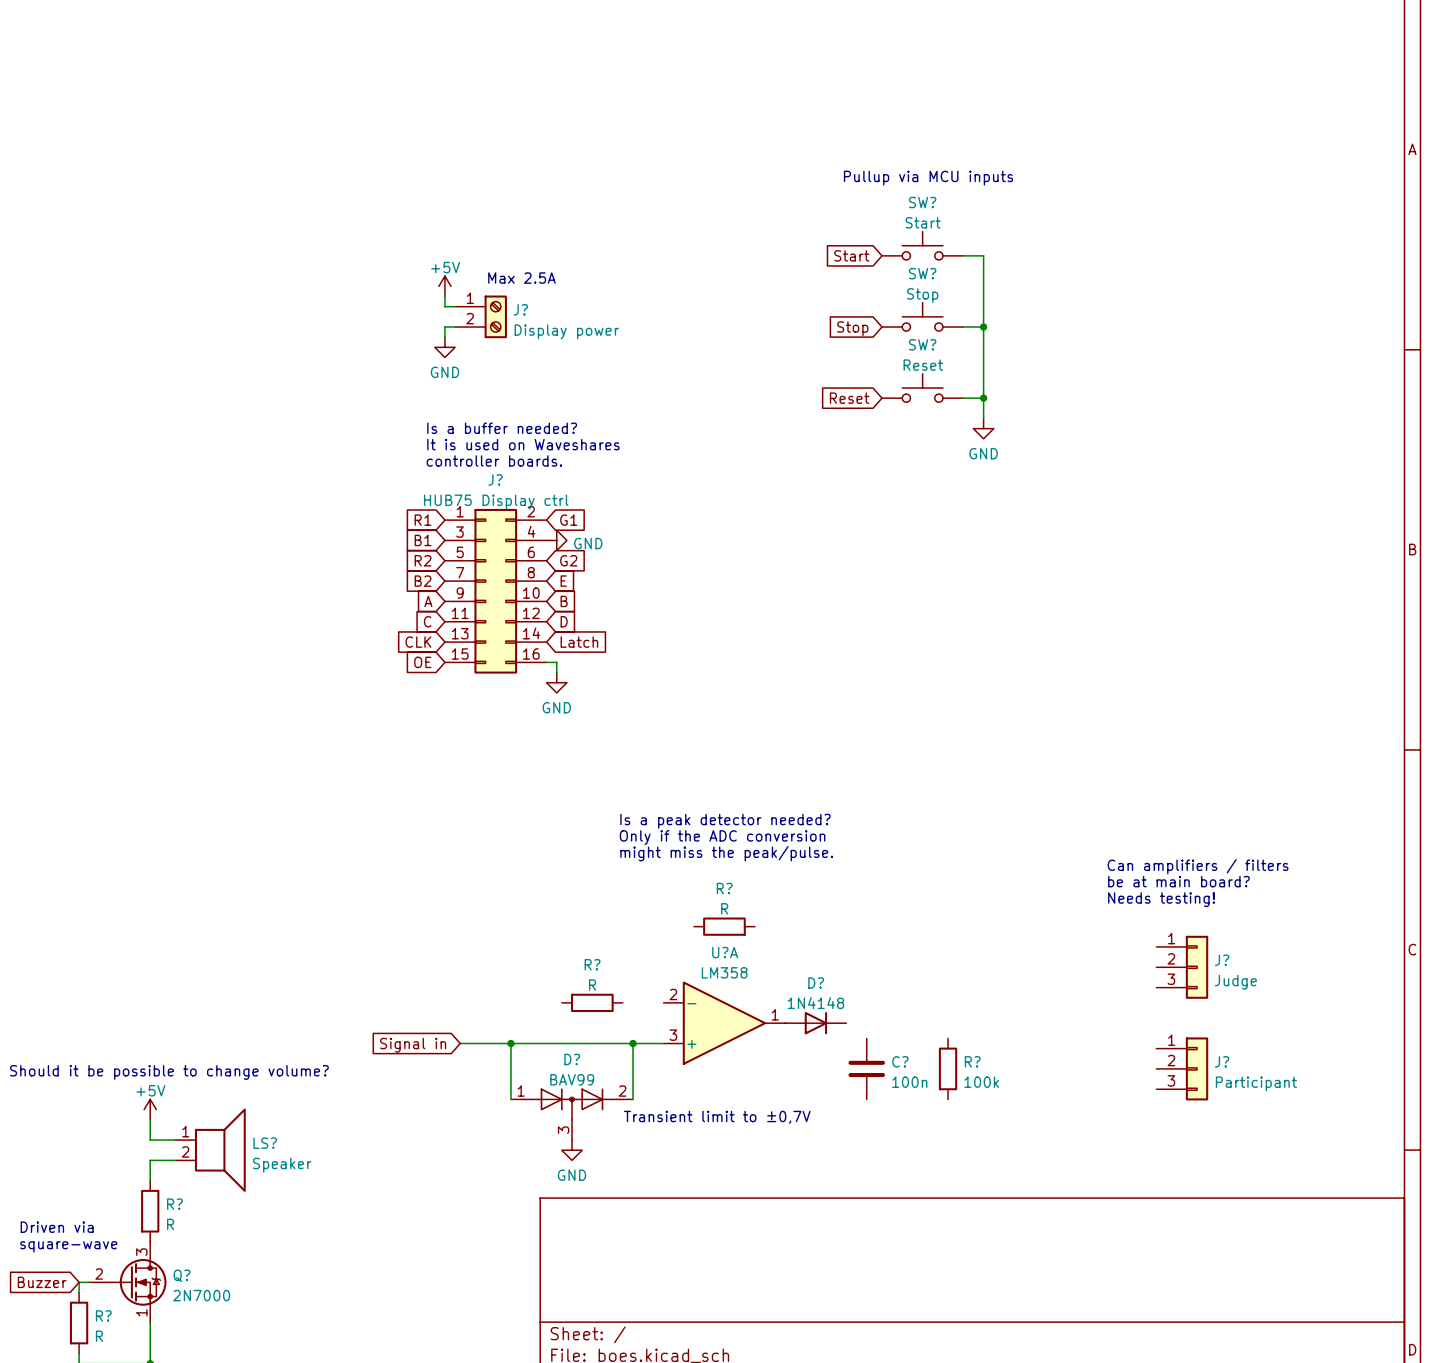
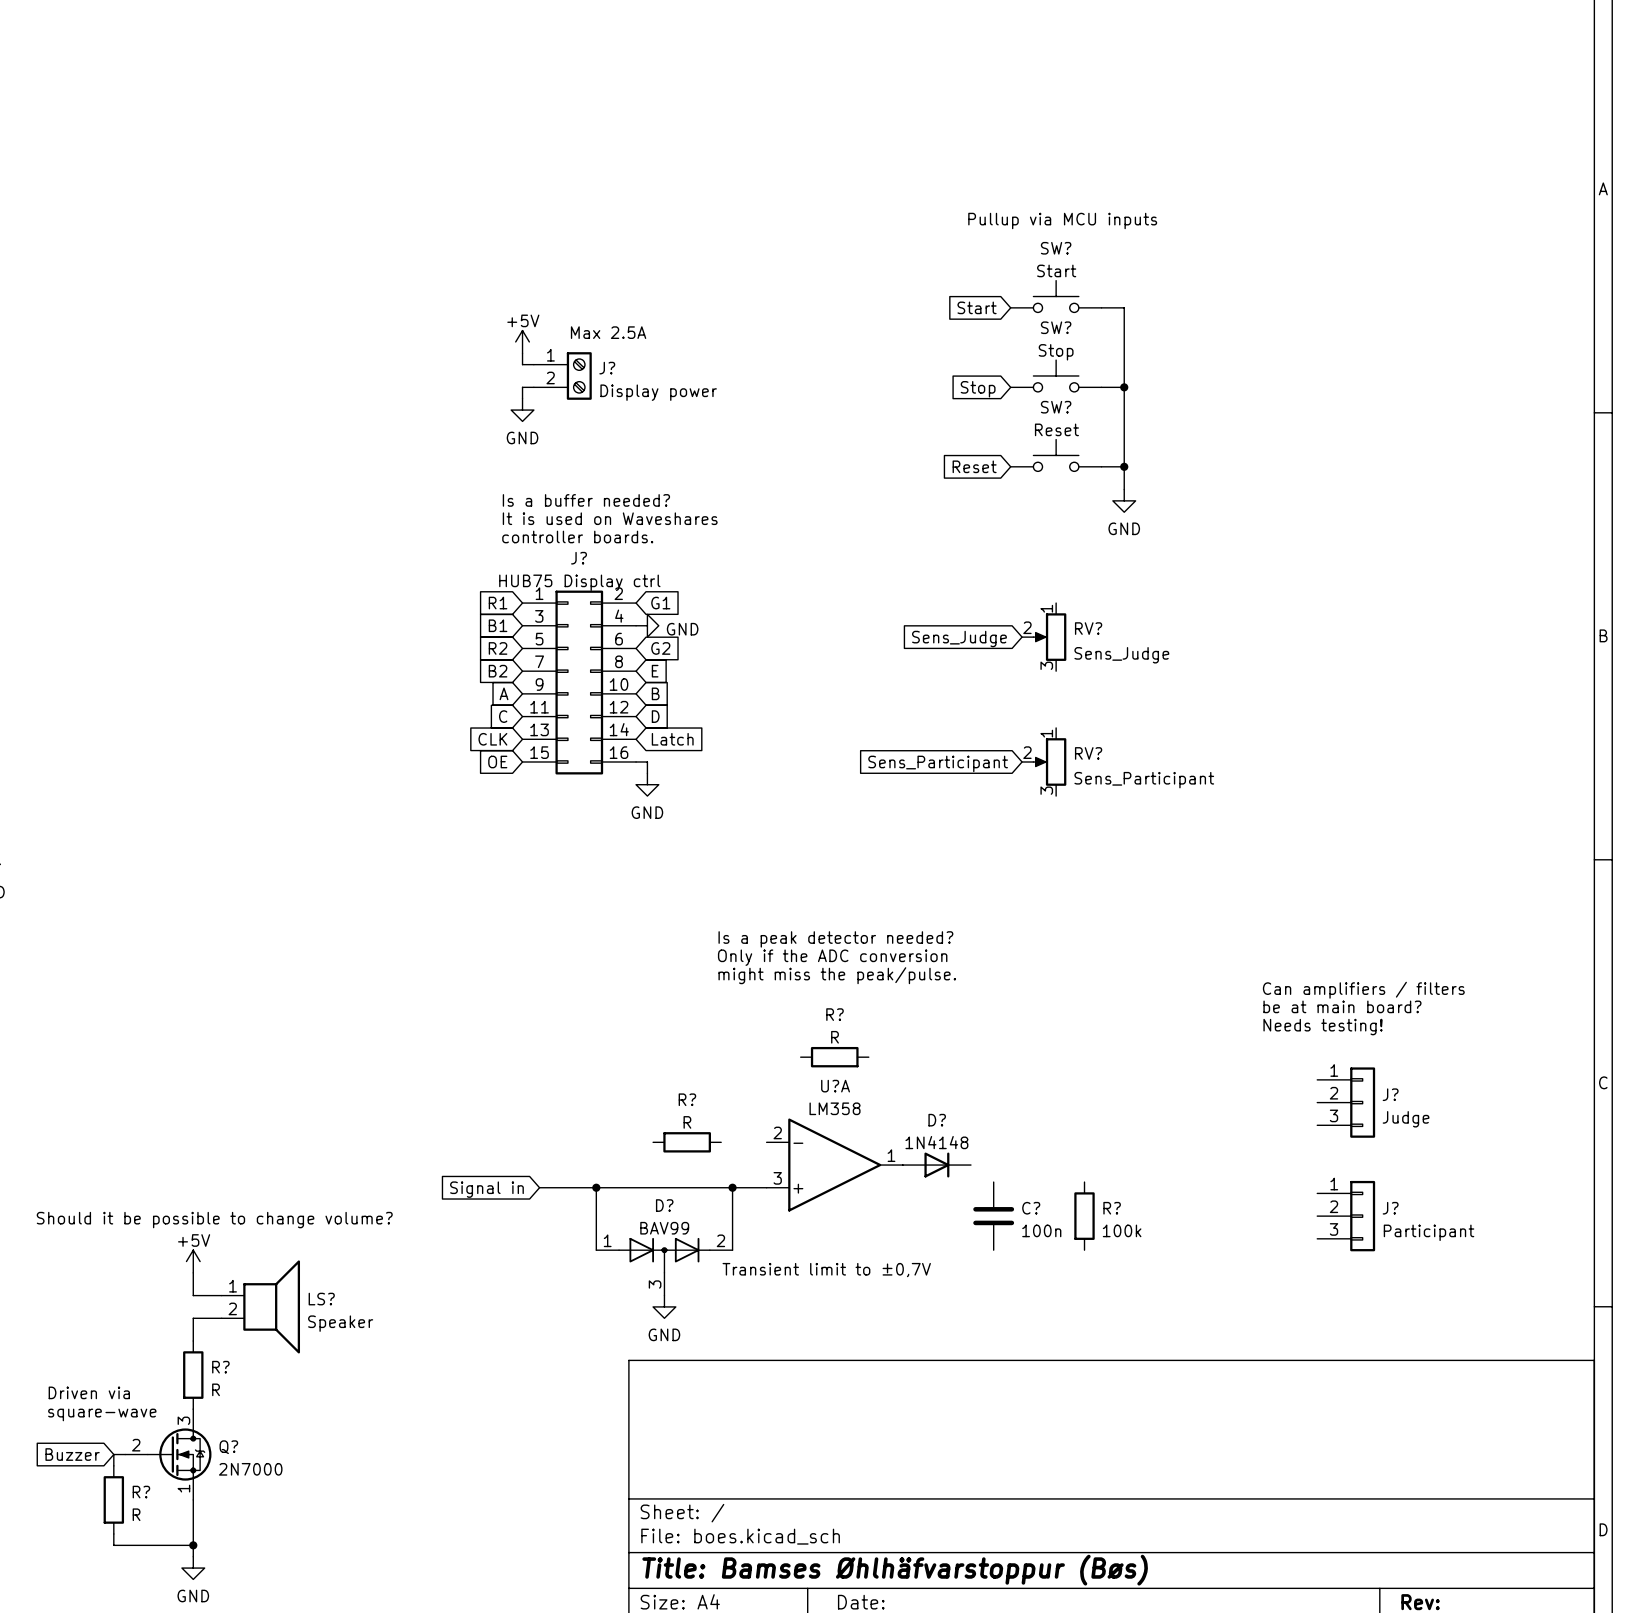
RV?: none -> Sens_Judge (1044, 637)
global label: none -> Sens_Judge (959, 639)
RV?: none -> Sens_Participant (1044, 761)
global label: none -> Sens_Participant (938, 763)

